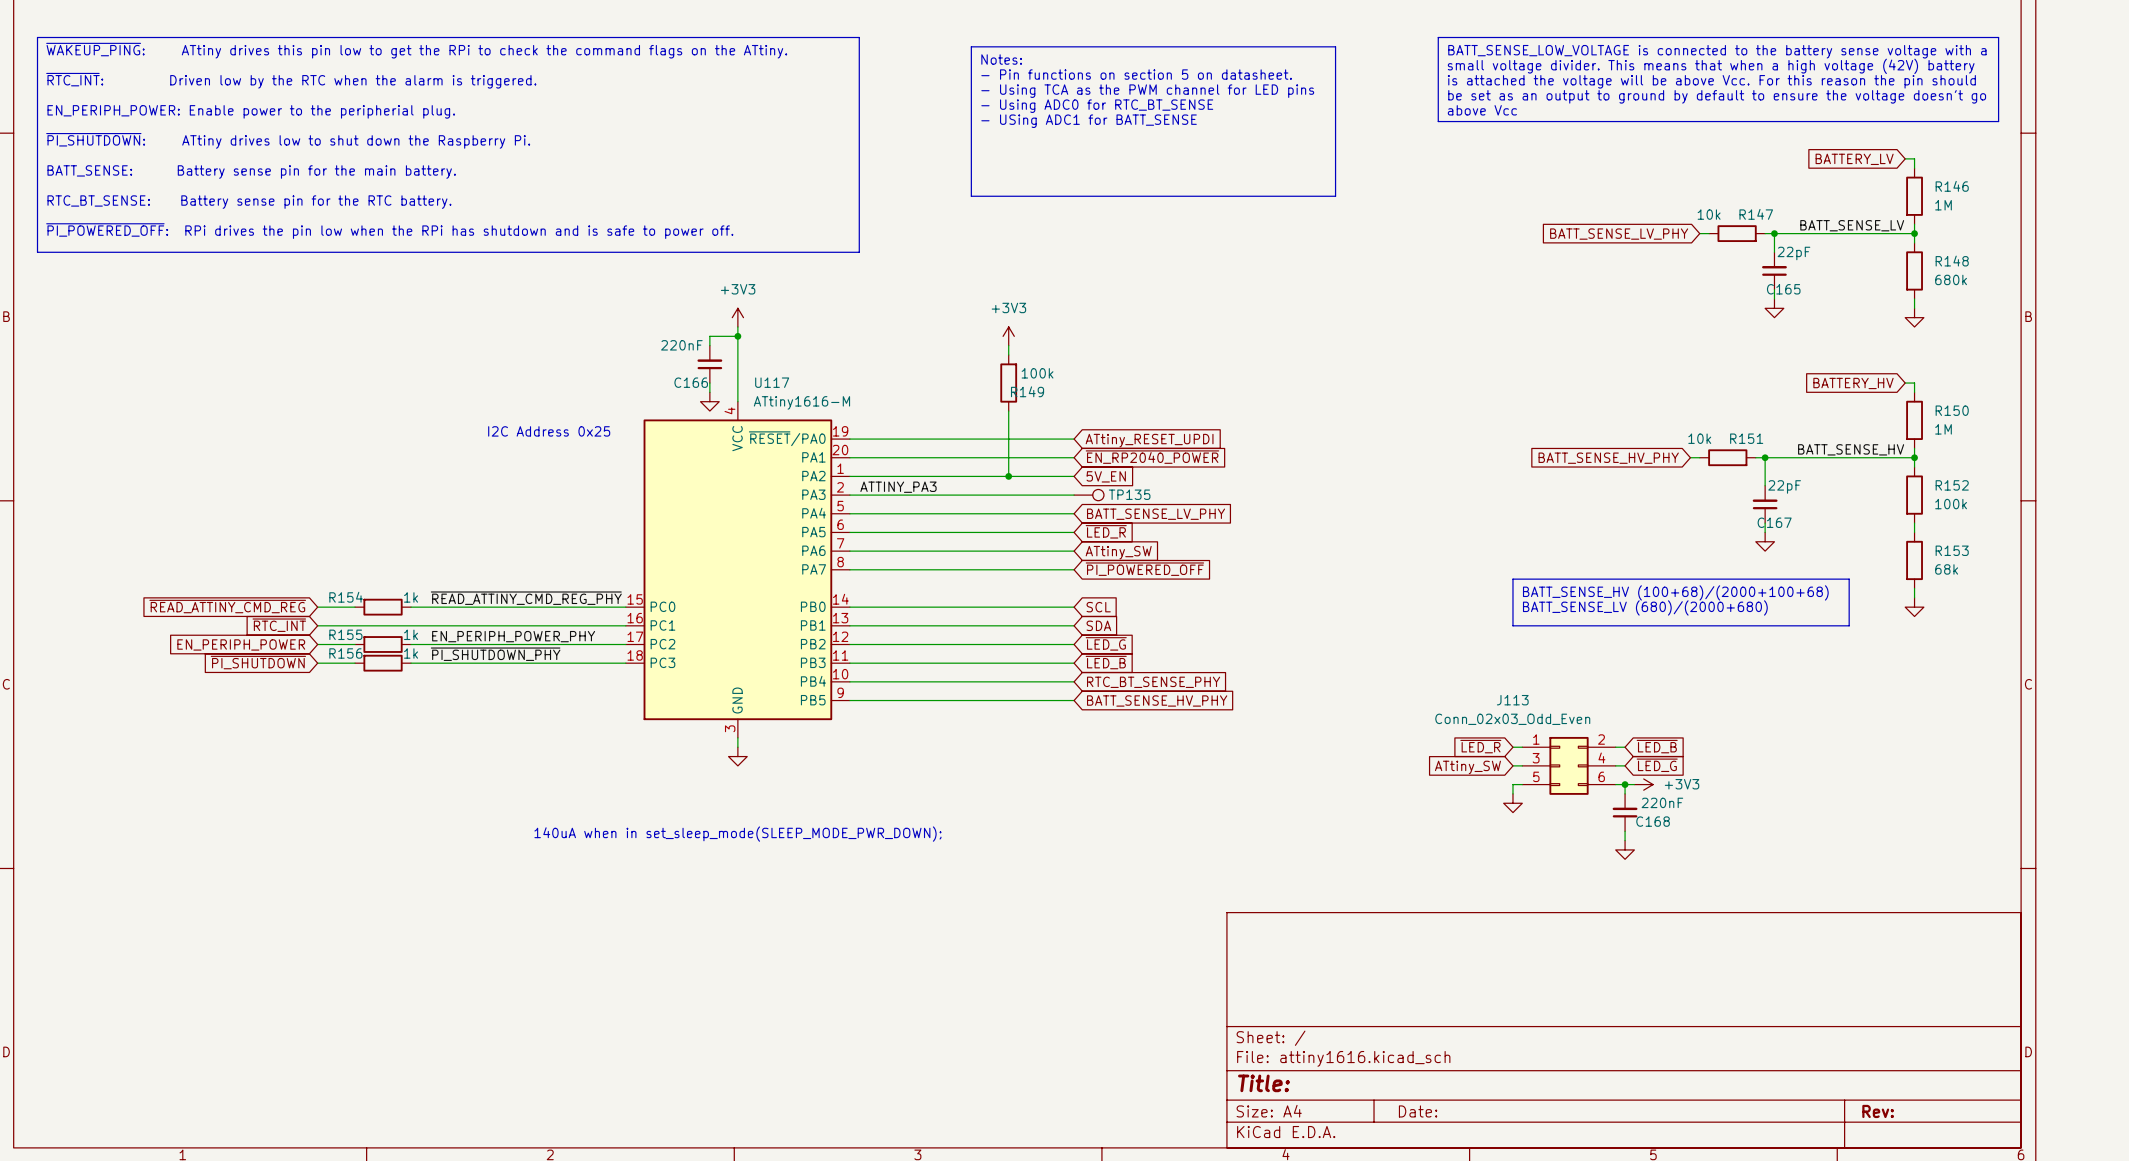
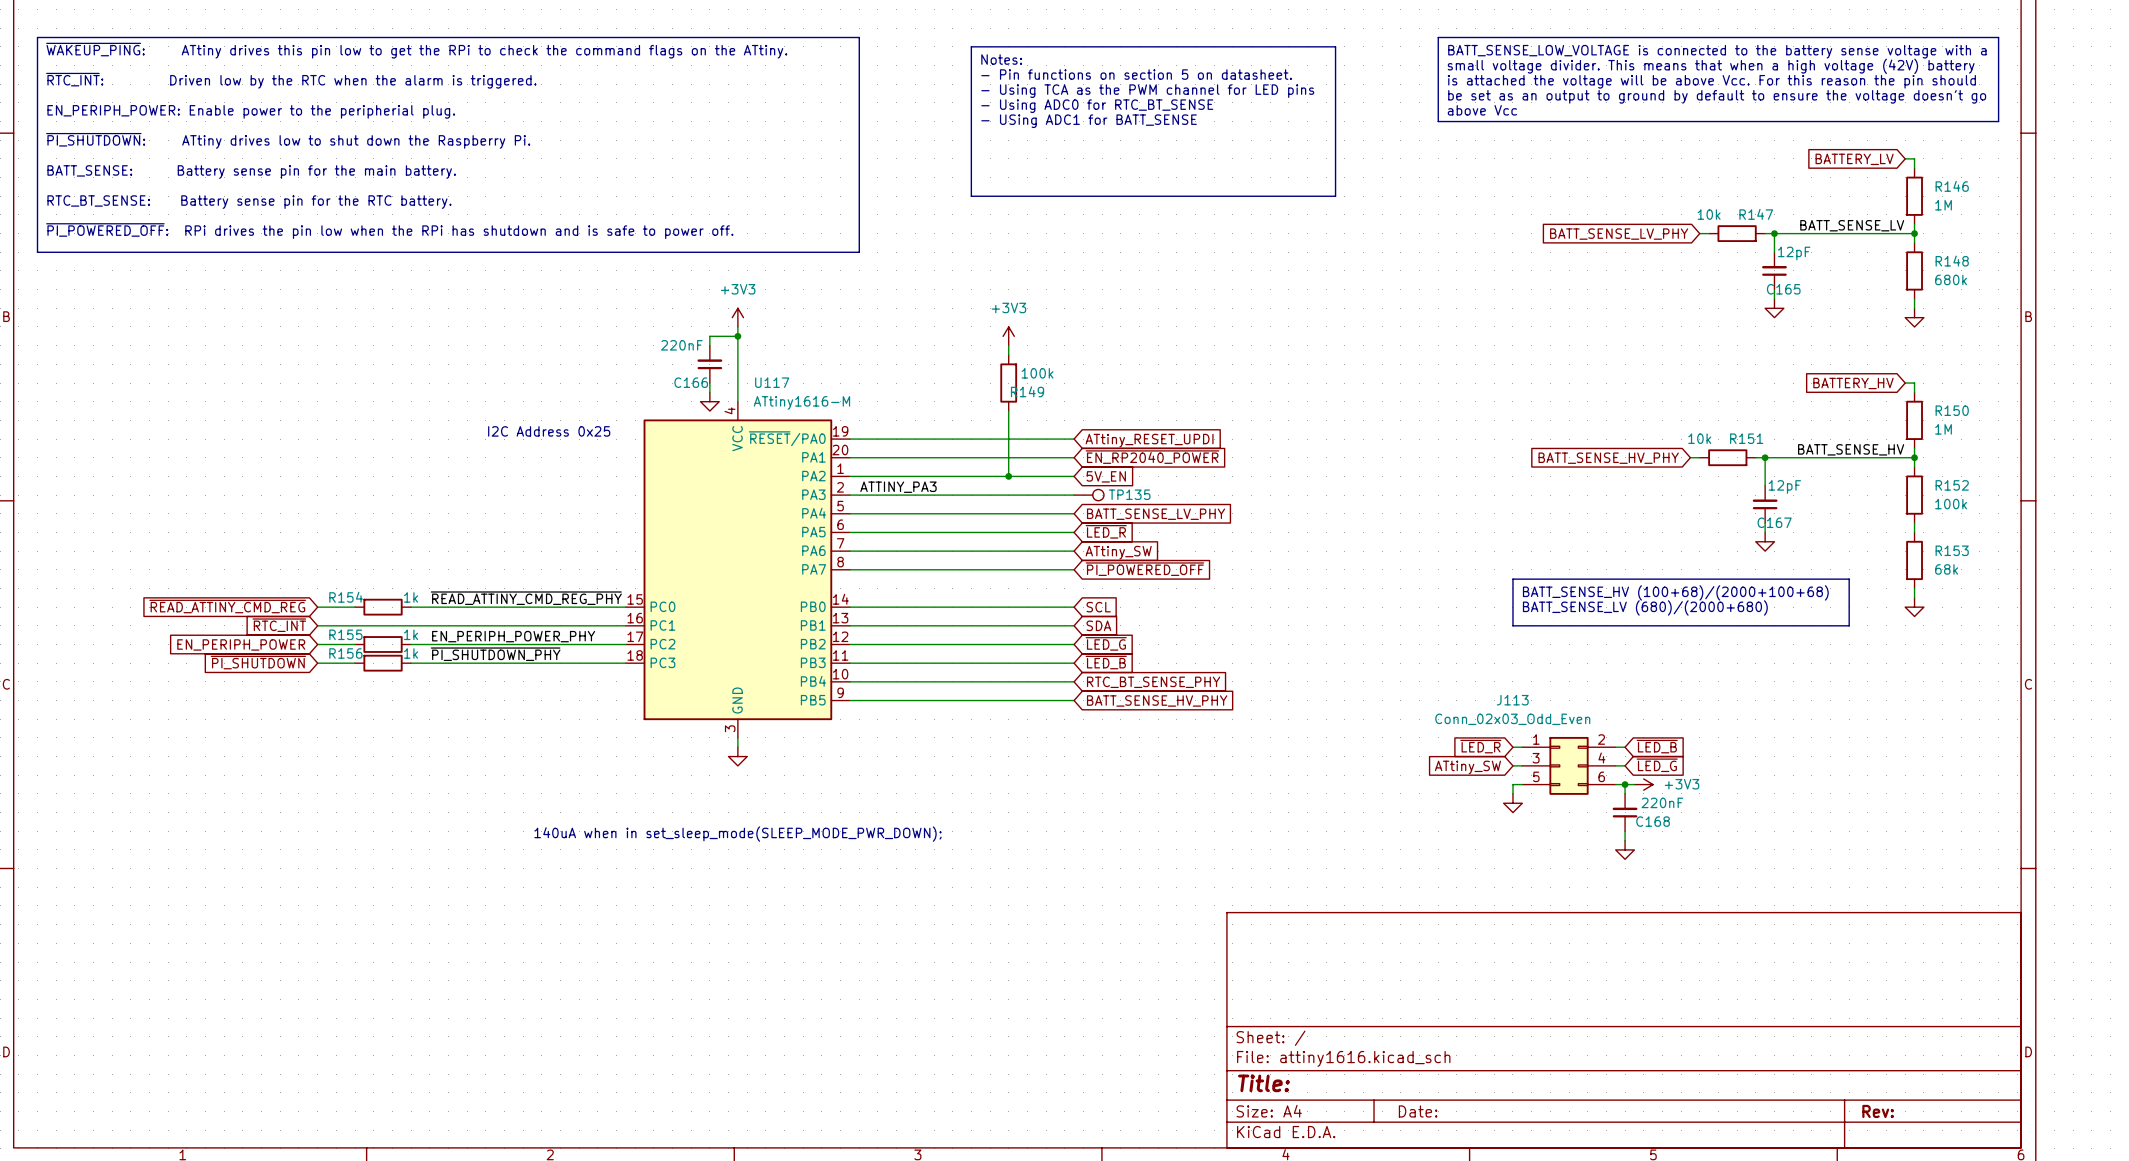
C165 value: 22pF (1793, 253) -> 12pF (1794, 253)
C167 value: 22pF (1784, 486) -> 12pF (1784, 486)

